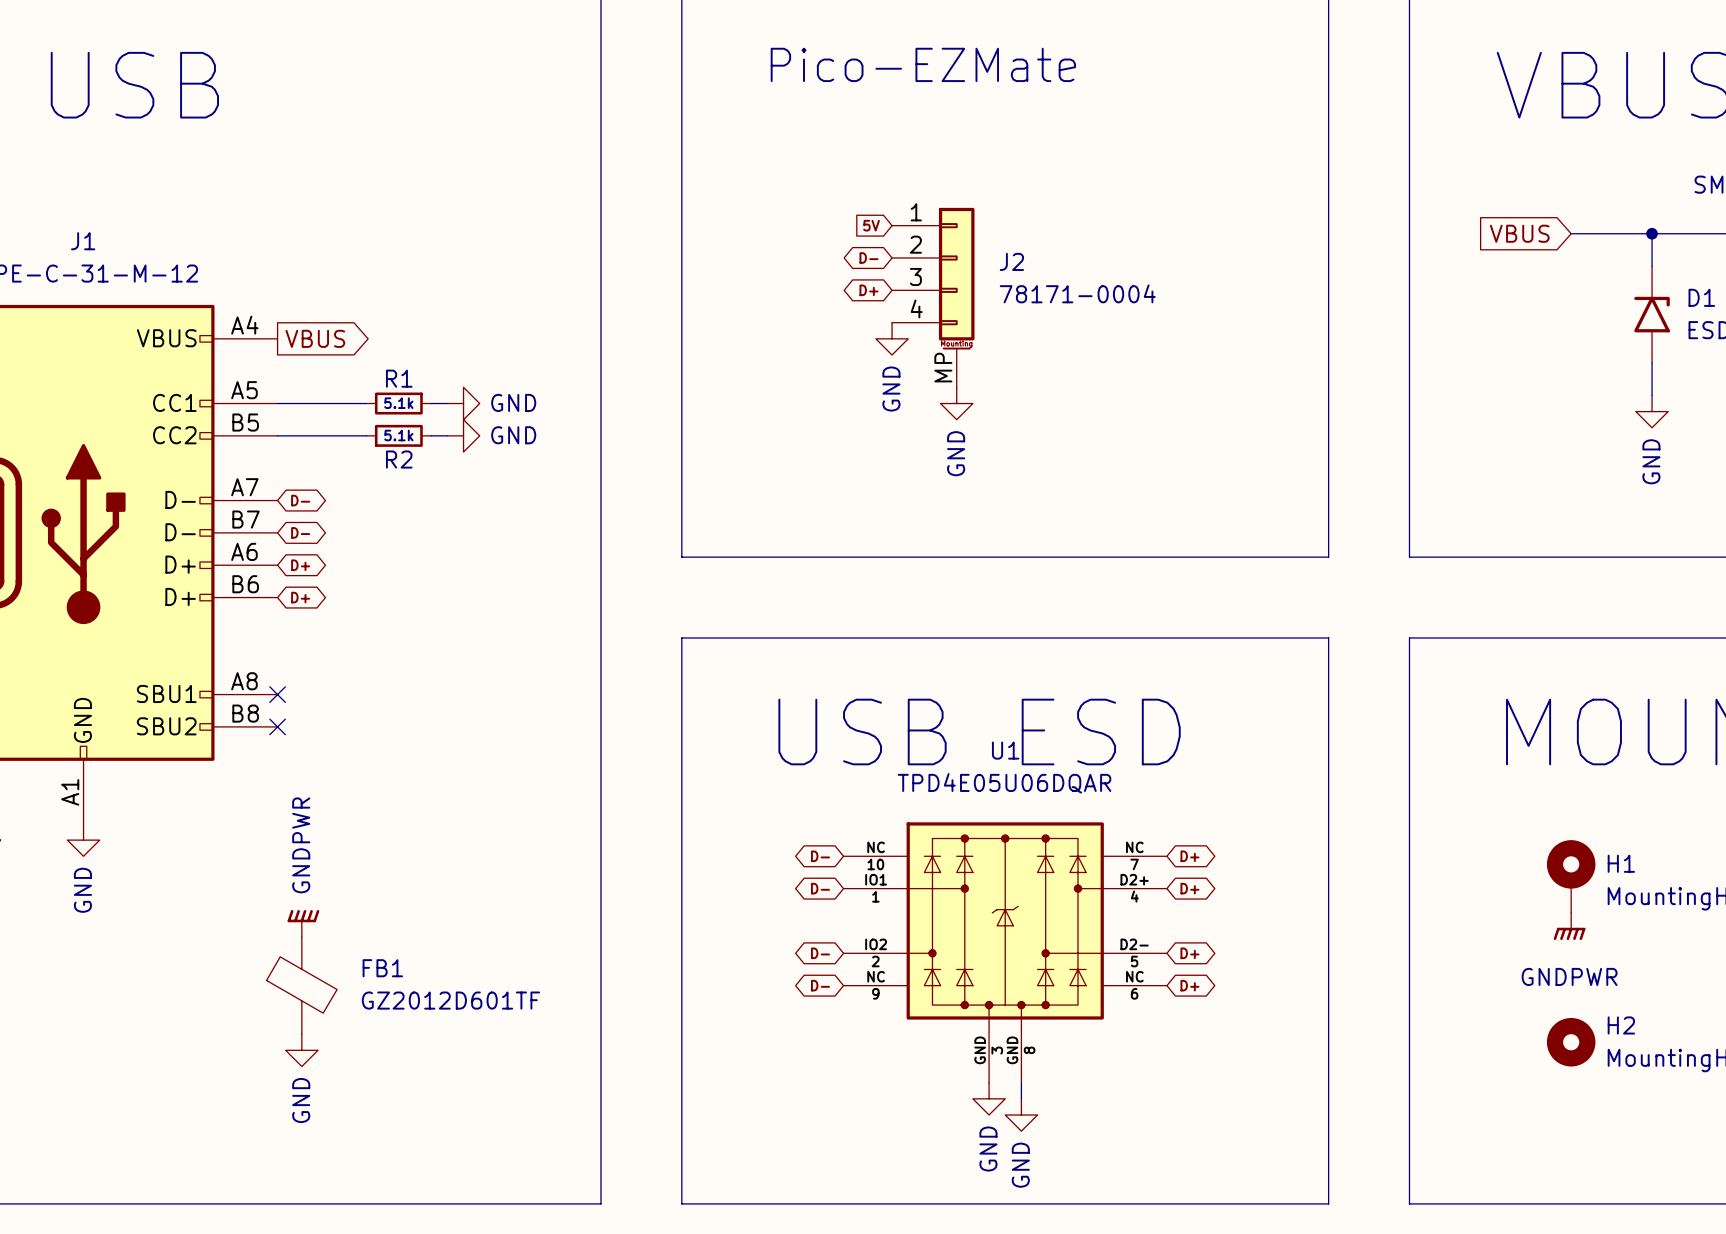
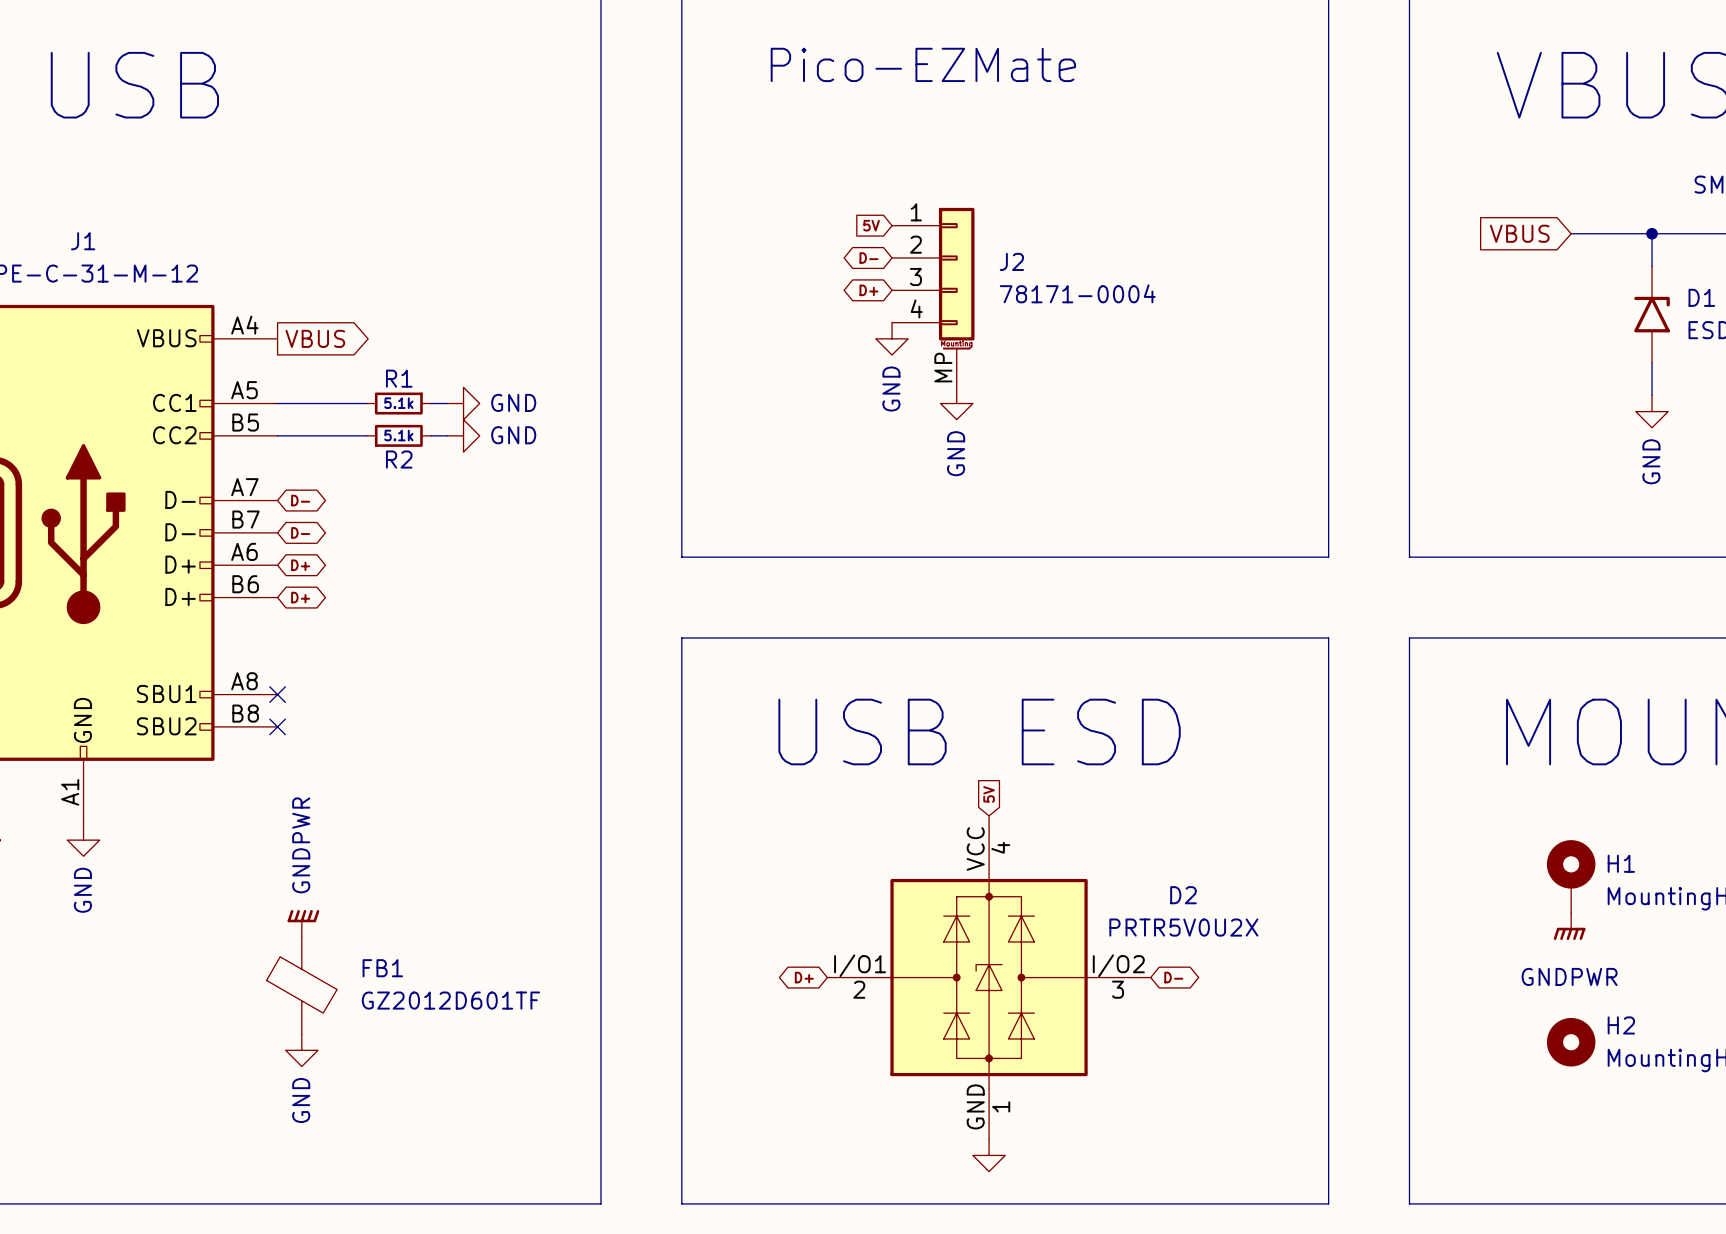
global label: none -> 5V (989, 794)
global label: D- (820, 856) -> none
global label: D+ (1189, 856) -> none
global label: D- (820, 888) -> none
global label: D+ (1189, 888) -> none
U1: TPD4E05U06DQAR (1005, 952) -> none
global label: D- (820, 953) -> none
global label: D+ (1189, 953) -> none
global label: none -> D+ (804, 977)
D2: none -> PRTR5V0U2X (989, 977)
global label: none -> D- (1173, 977)
global label: D- (820, 985) -> none
global label: D+ (1189, 985) -> none
wire: (1021, 1082) (1021, 1098) -> none
power symbol: GND (989, 1098) -> none
power symbol: GND (1021, 1115) -> none
power symbol: none -> (989, 1155)

